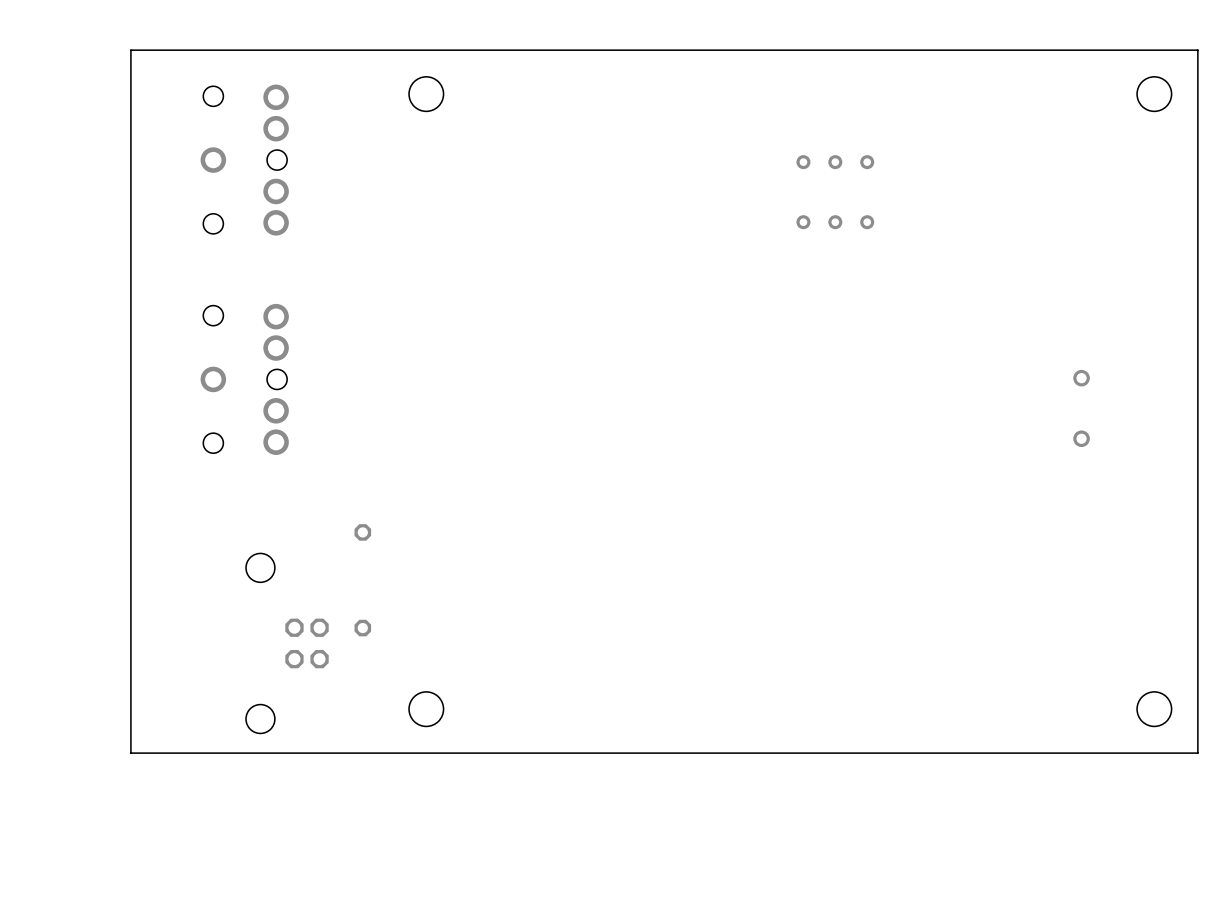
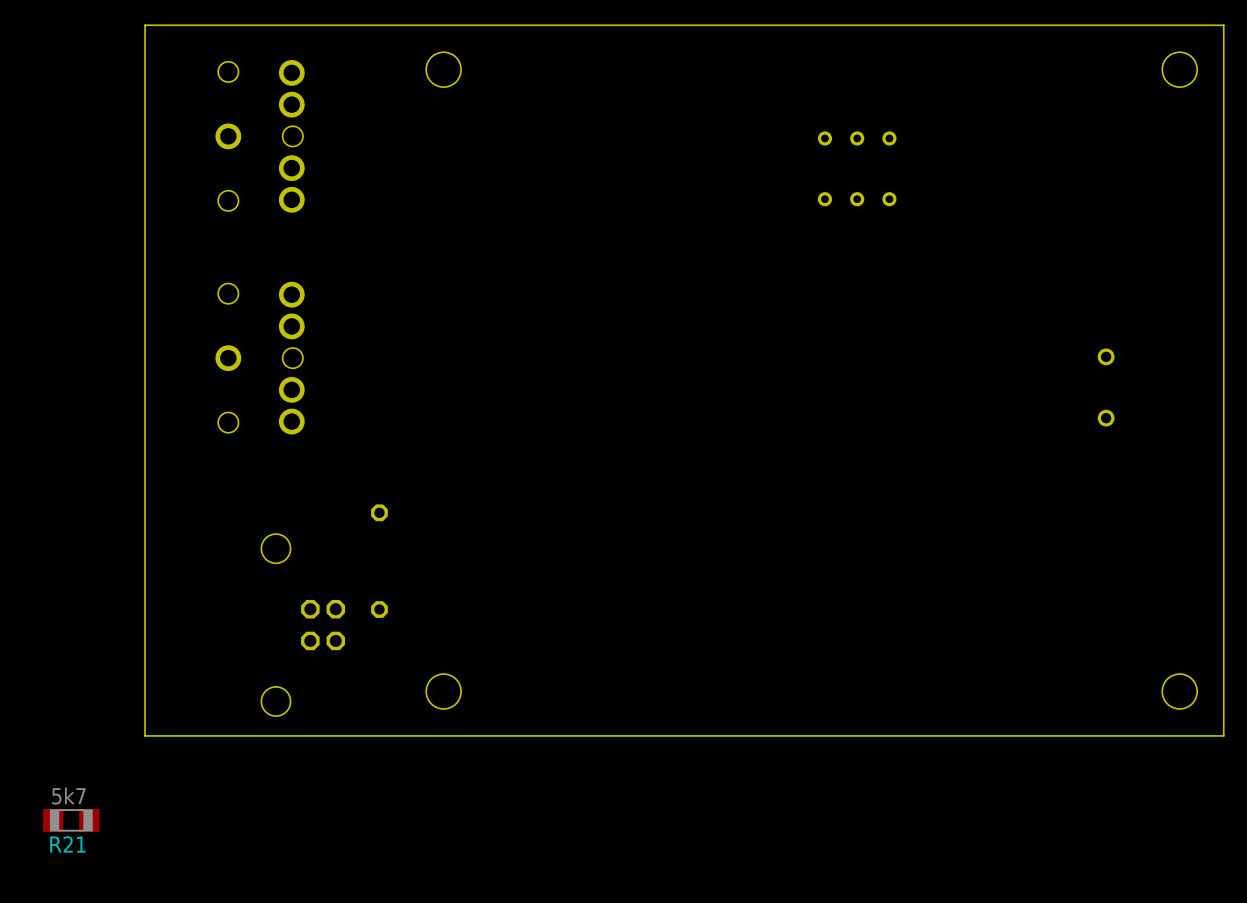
R21: none -> 5k7 (71, 820)

